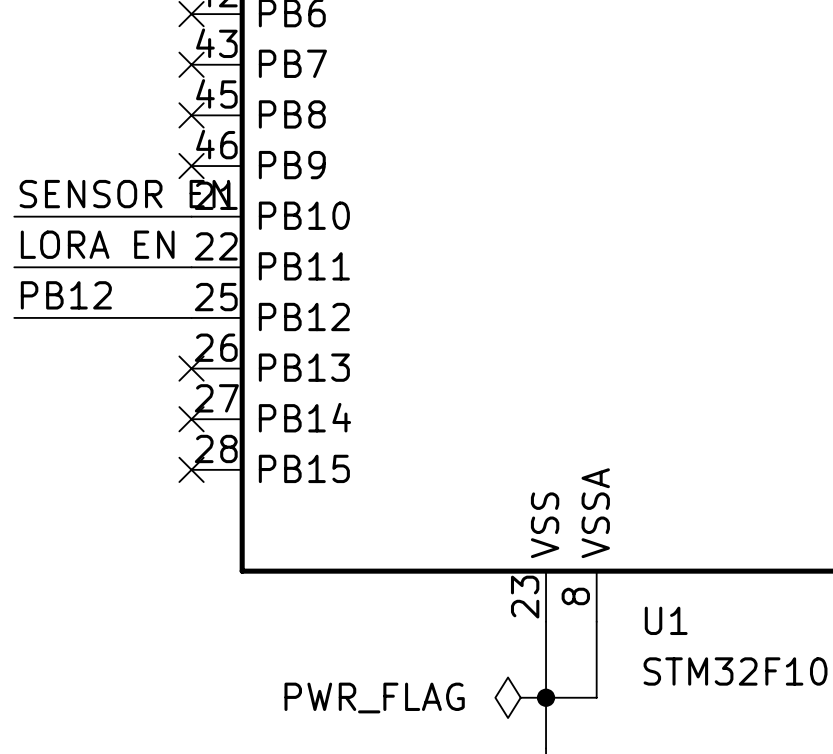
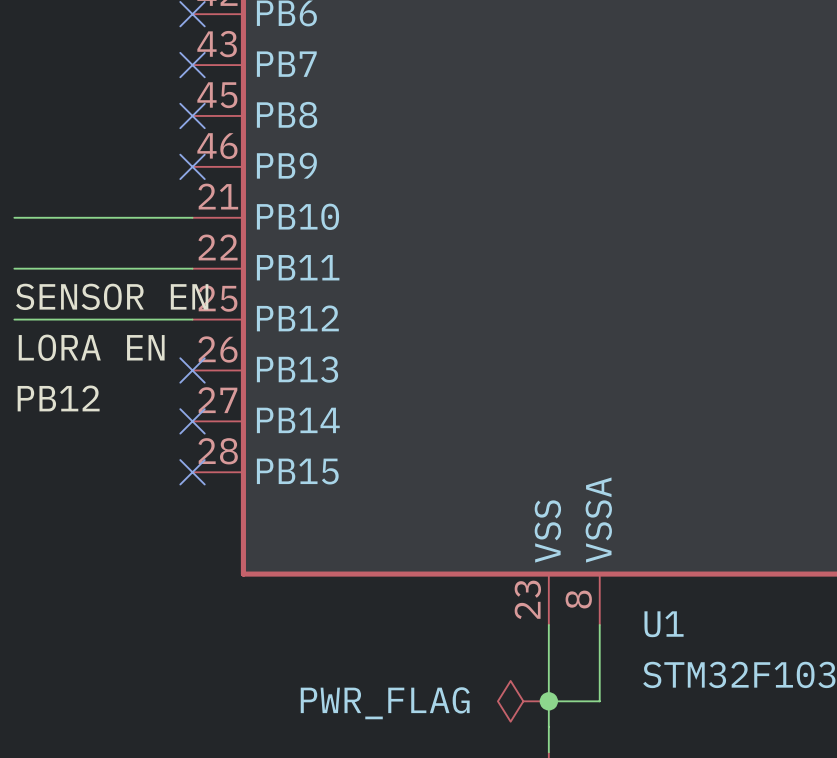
label: SENSOR EN (124, 194) -> none
label position: LORA EN (97, 244) -> LORA EN (91, 347)
label: PB12 (66, 295) -> SENSOR EN (112, 296)
label: none -> PB12 (58, 398)

